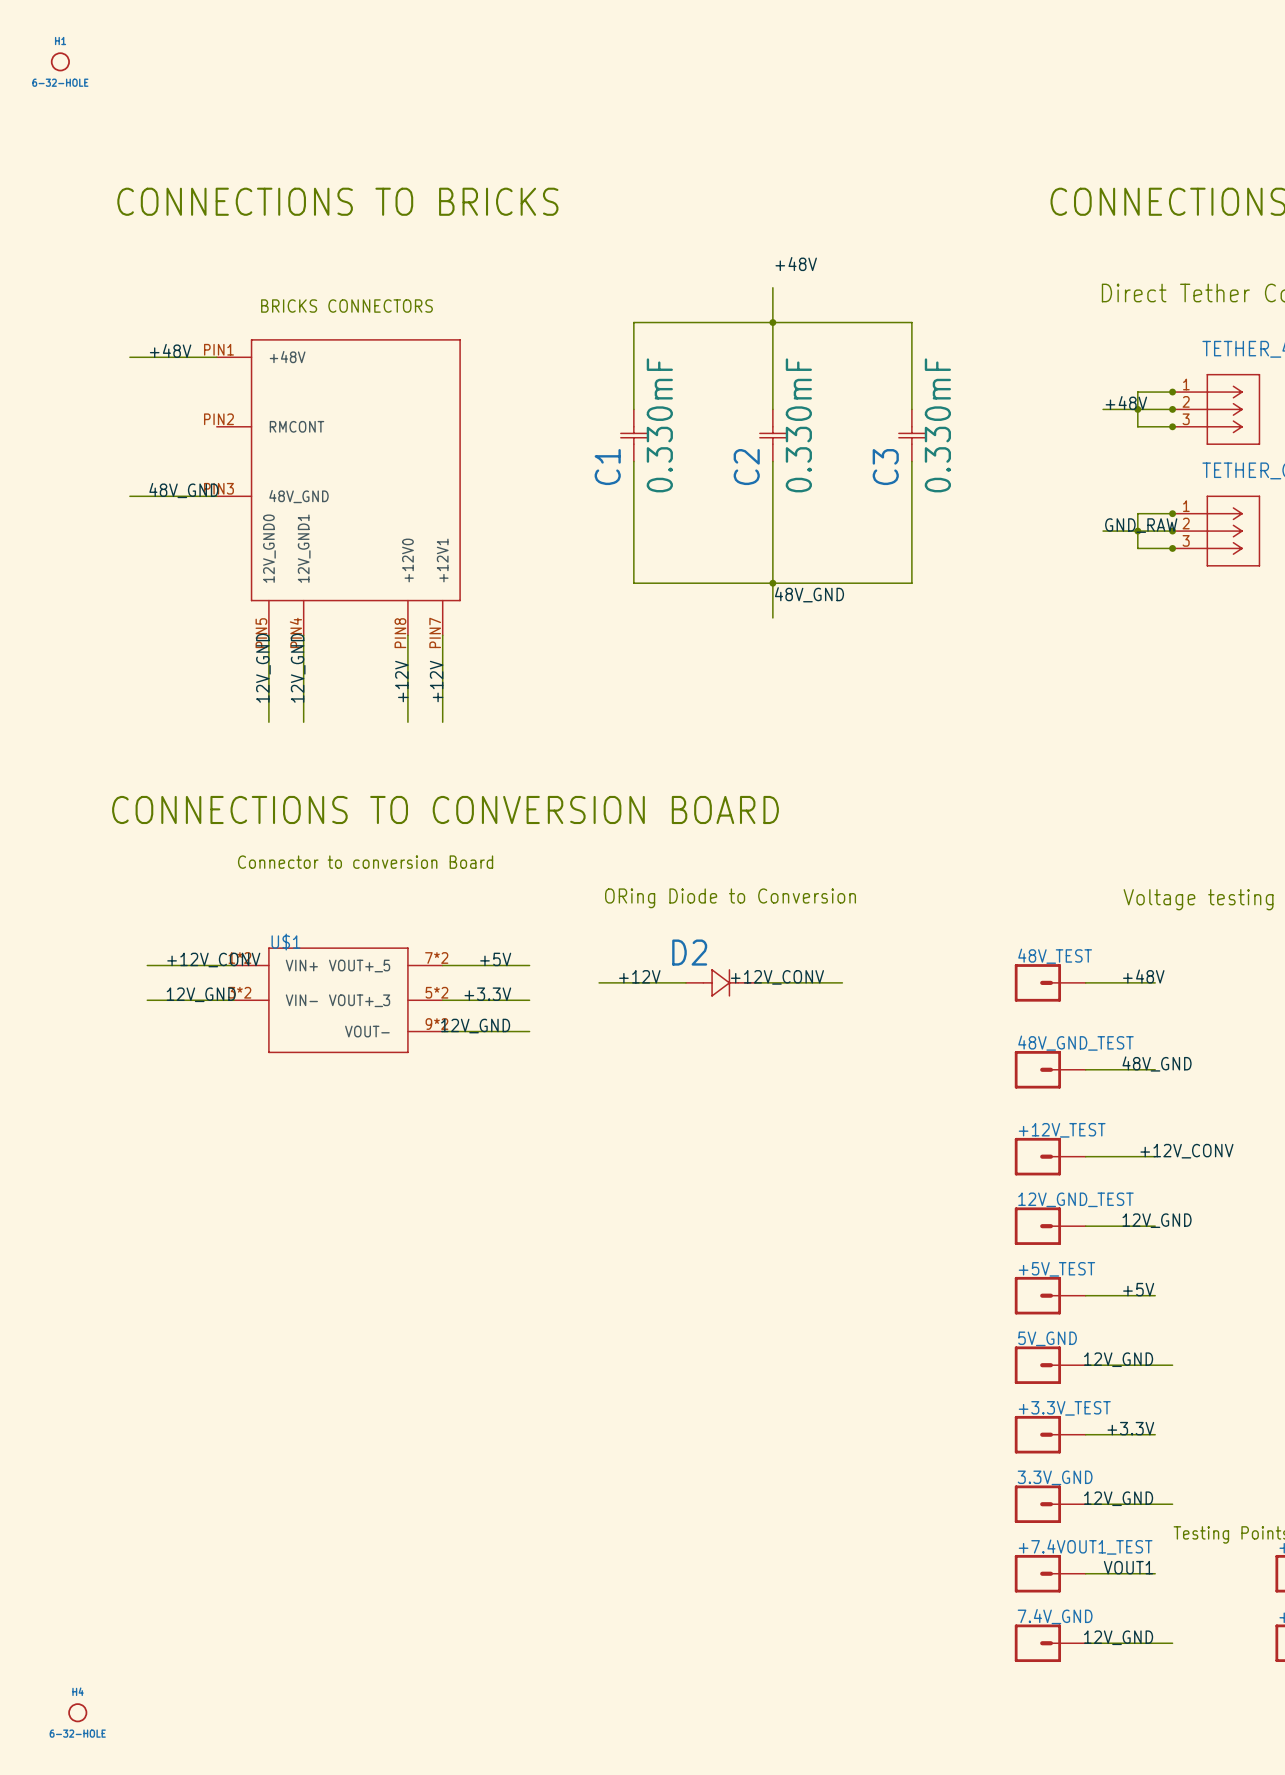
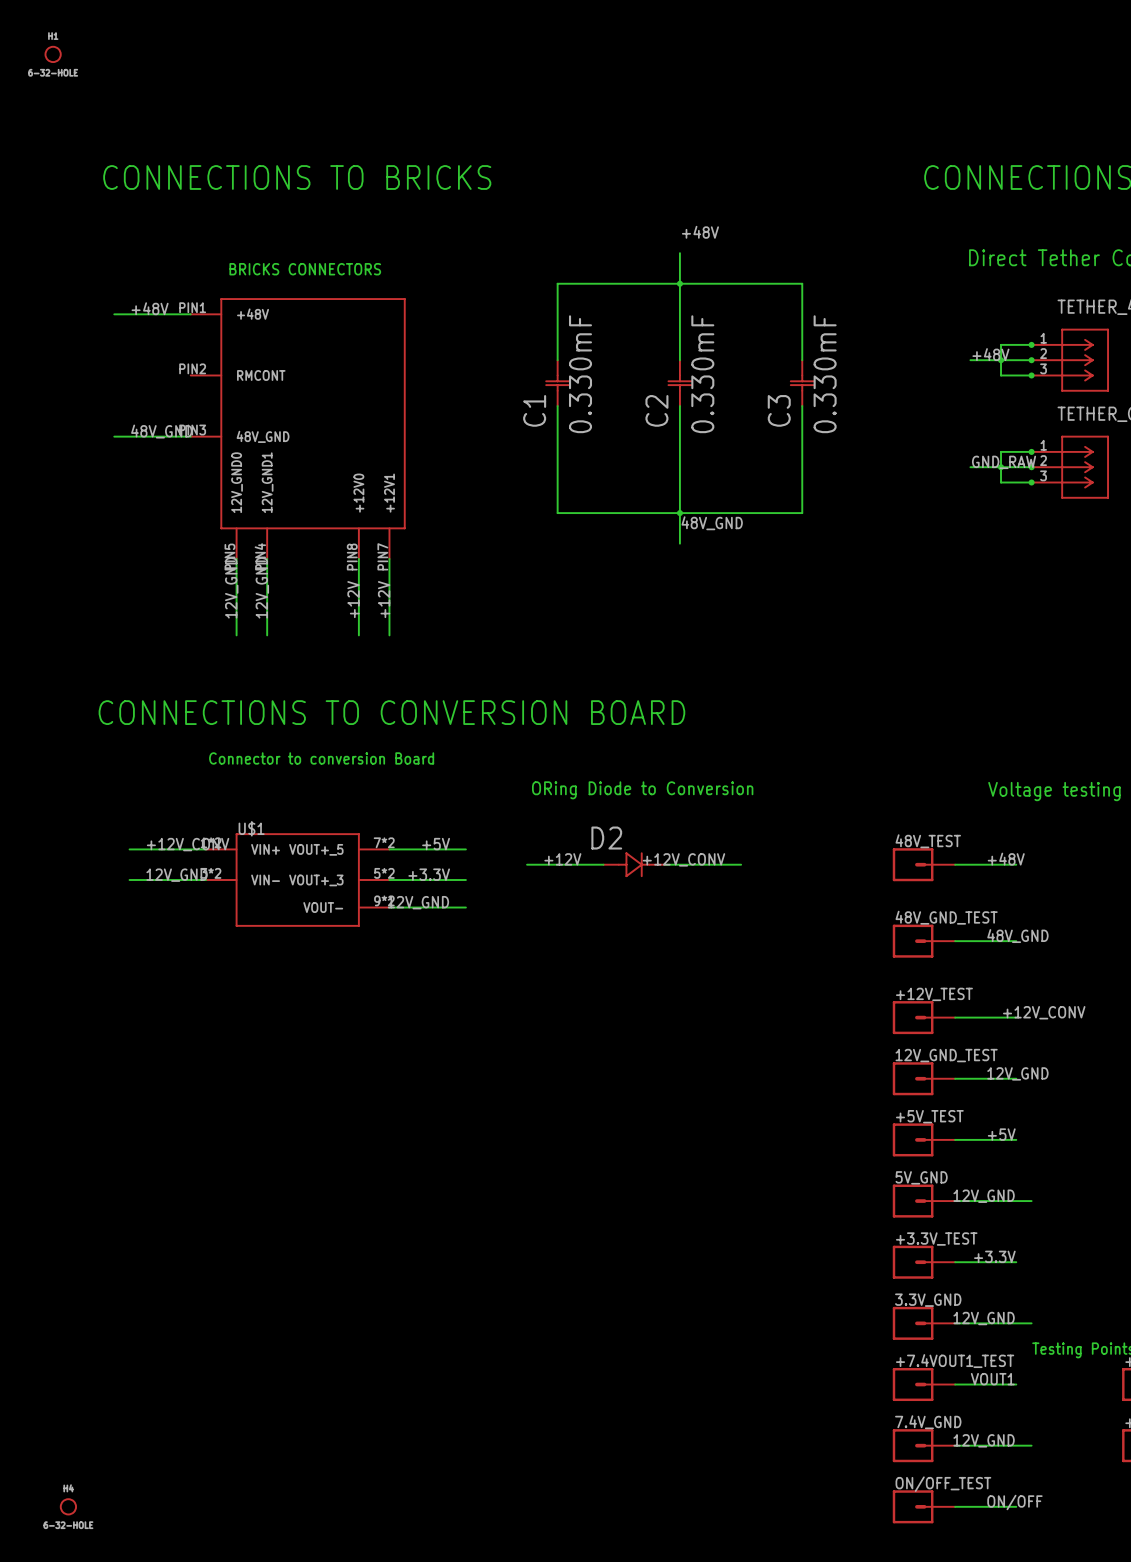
label: none -> ON/OFF (1014, 1502)
ON/OFF_TEST: none -> (923, 1506)
wire: none -> (955, 1506) (1016, 1506)

